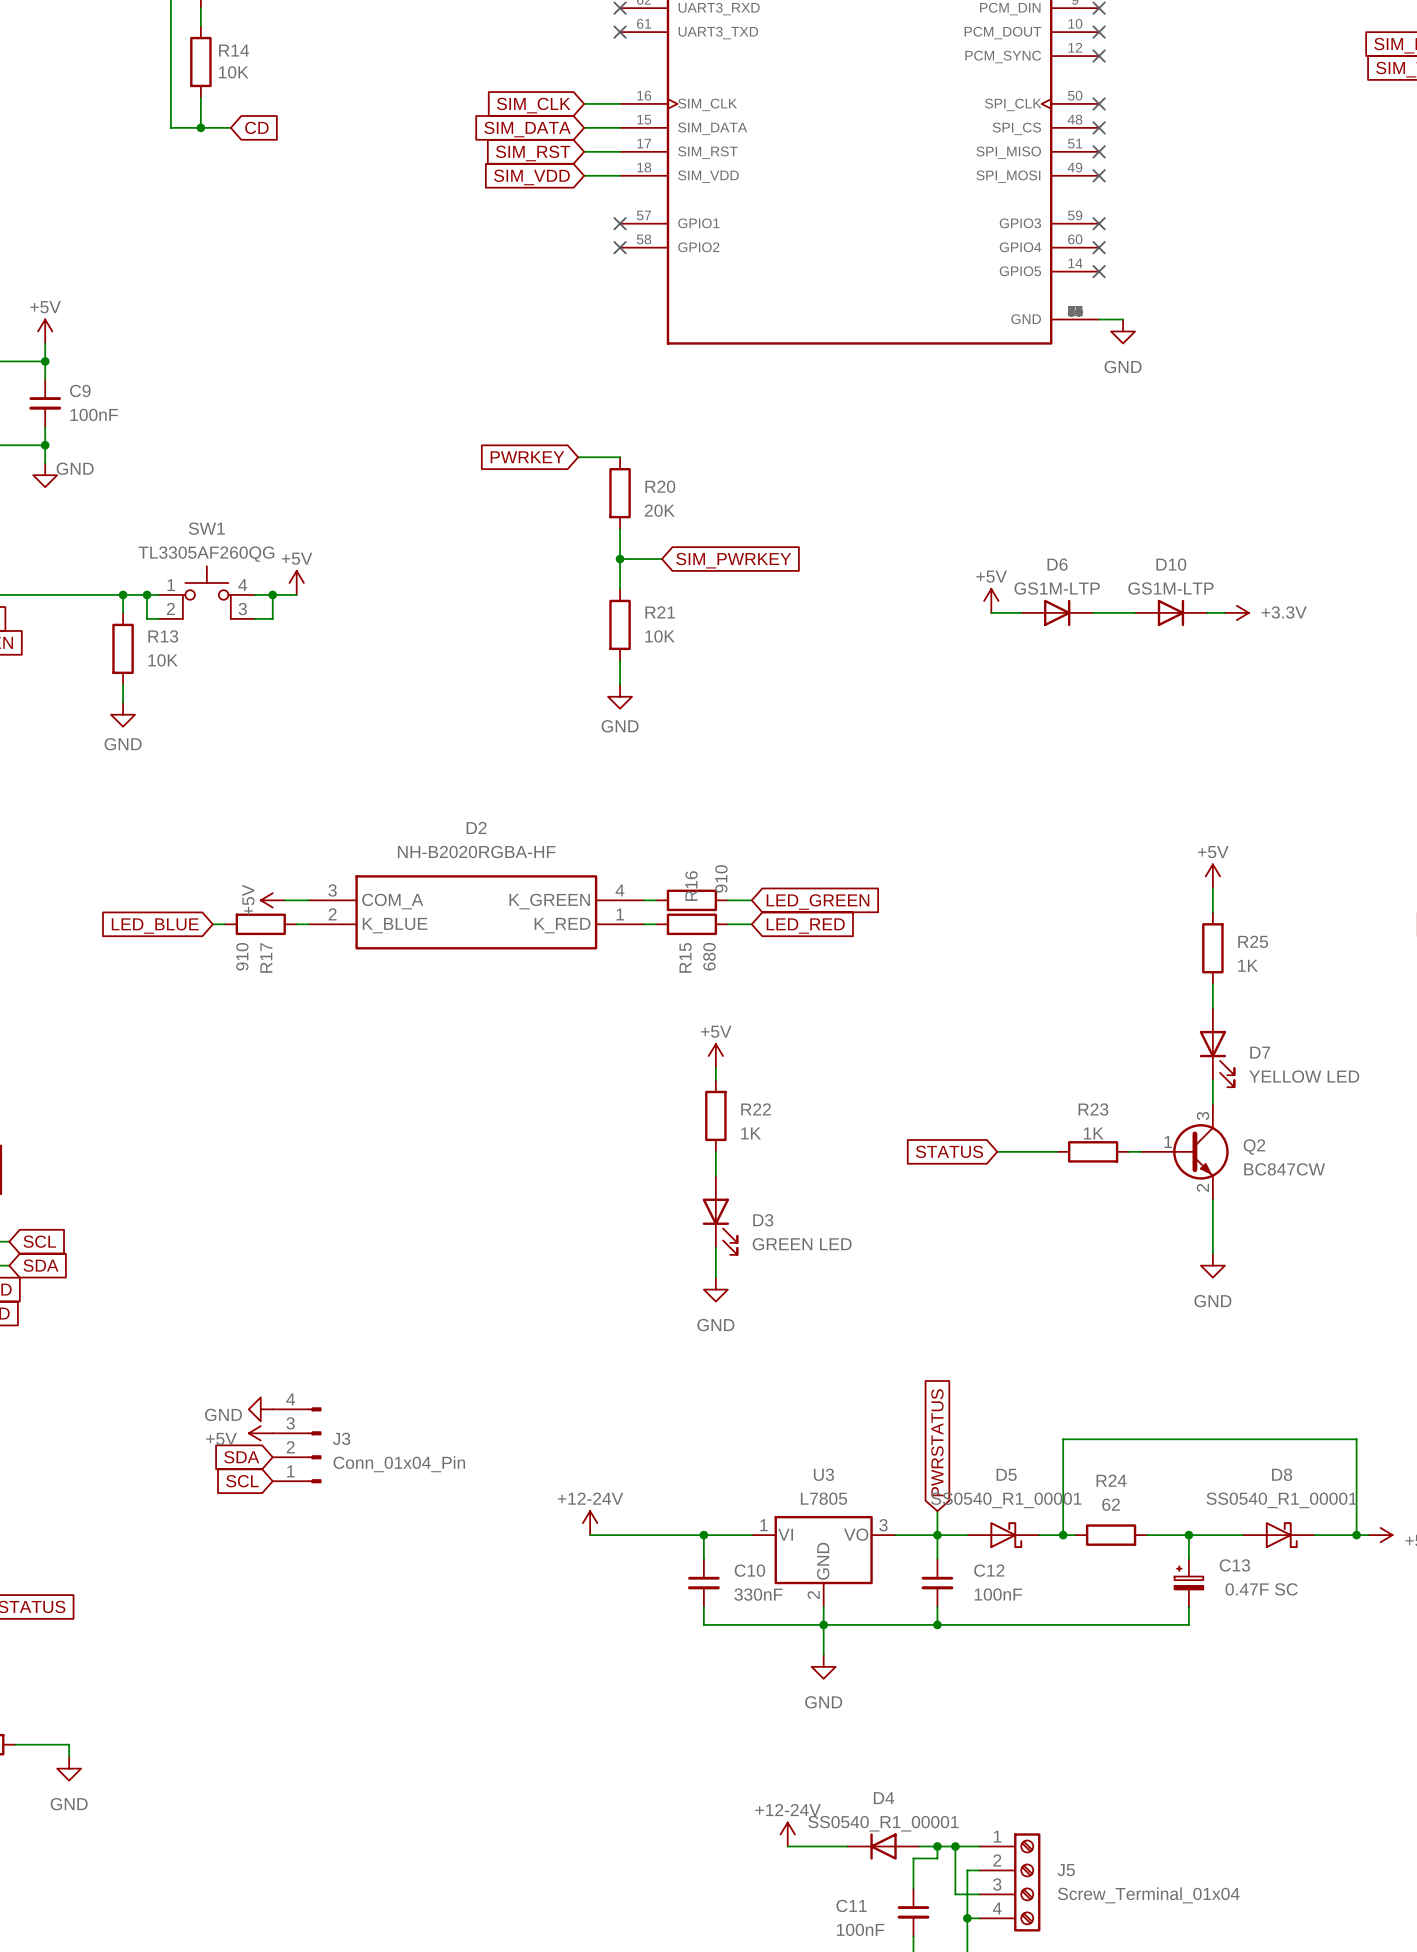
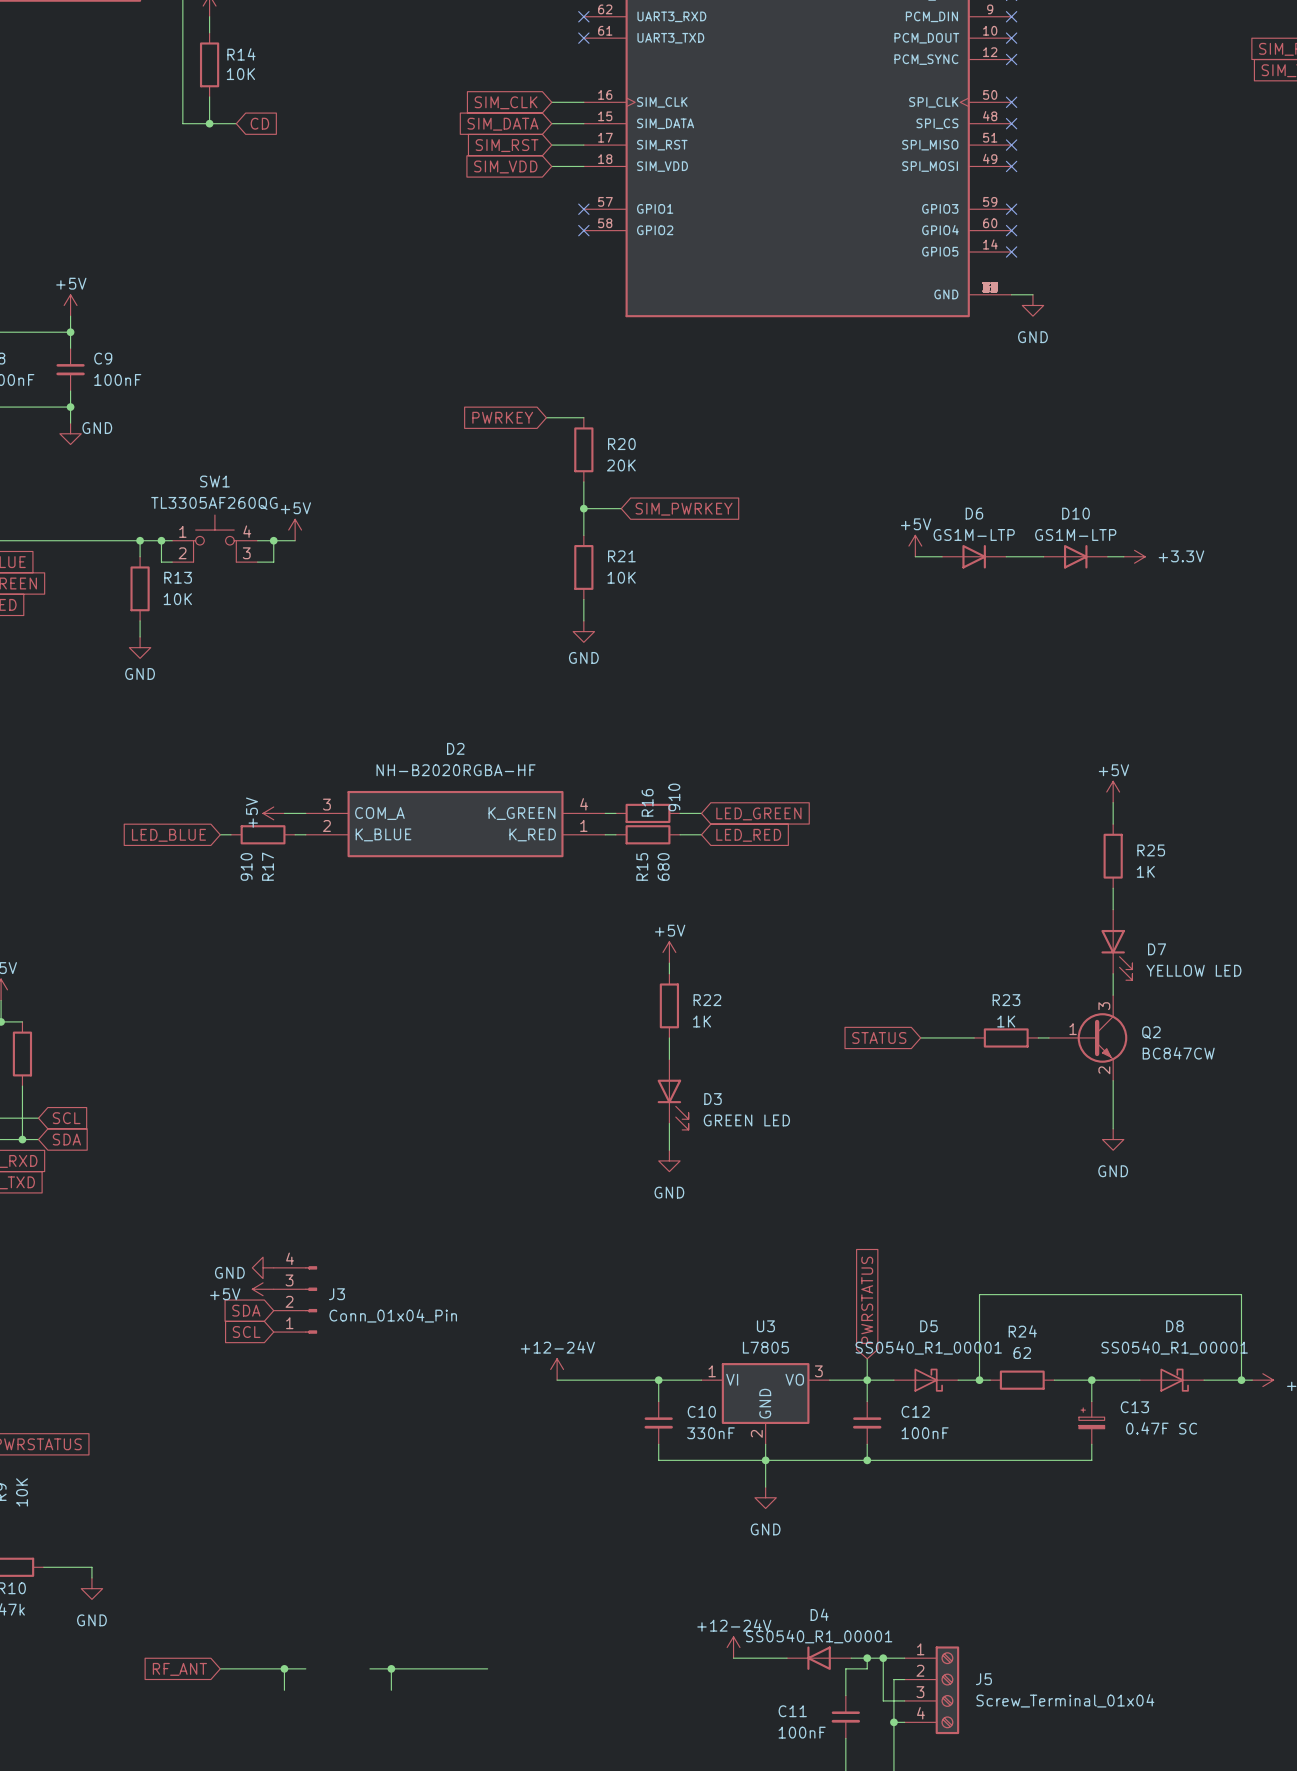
wire: none -> (220, 1668) (305, 1668)
wire: none -> (284, 1668) (284, 1690)
junction: none -> (284, 1668)
wire: none -> (369, 1668) (487, 1668)
wire: none -> (391, 1668) (391, 1690)
junction: none -> (391, 1668)
global label: none -> RF_ANT (179, 1669)

